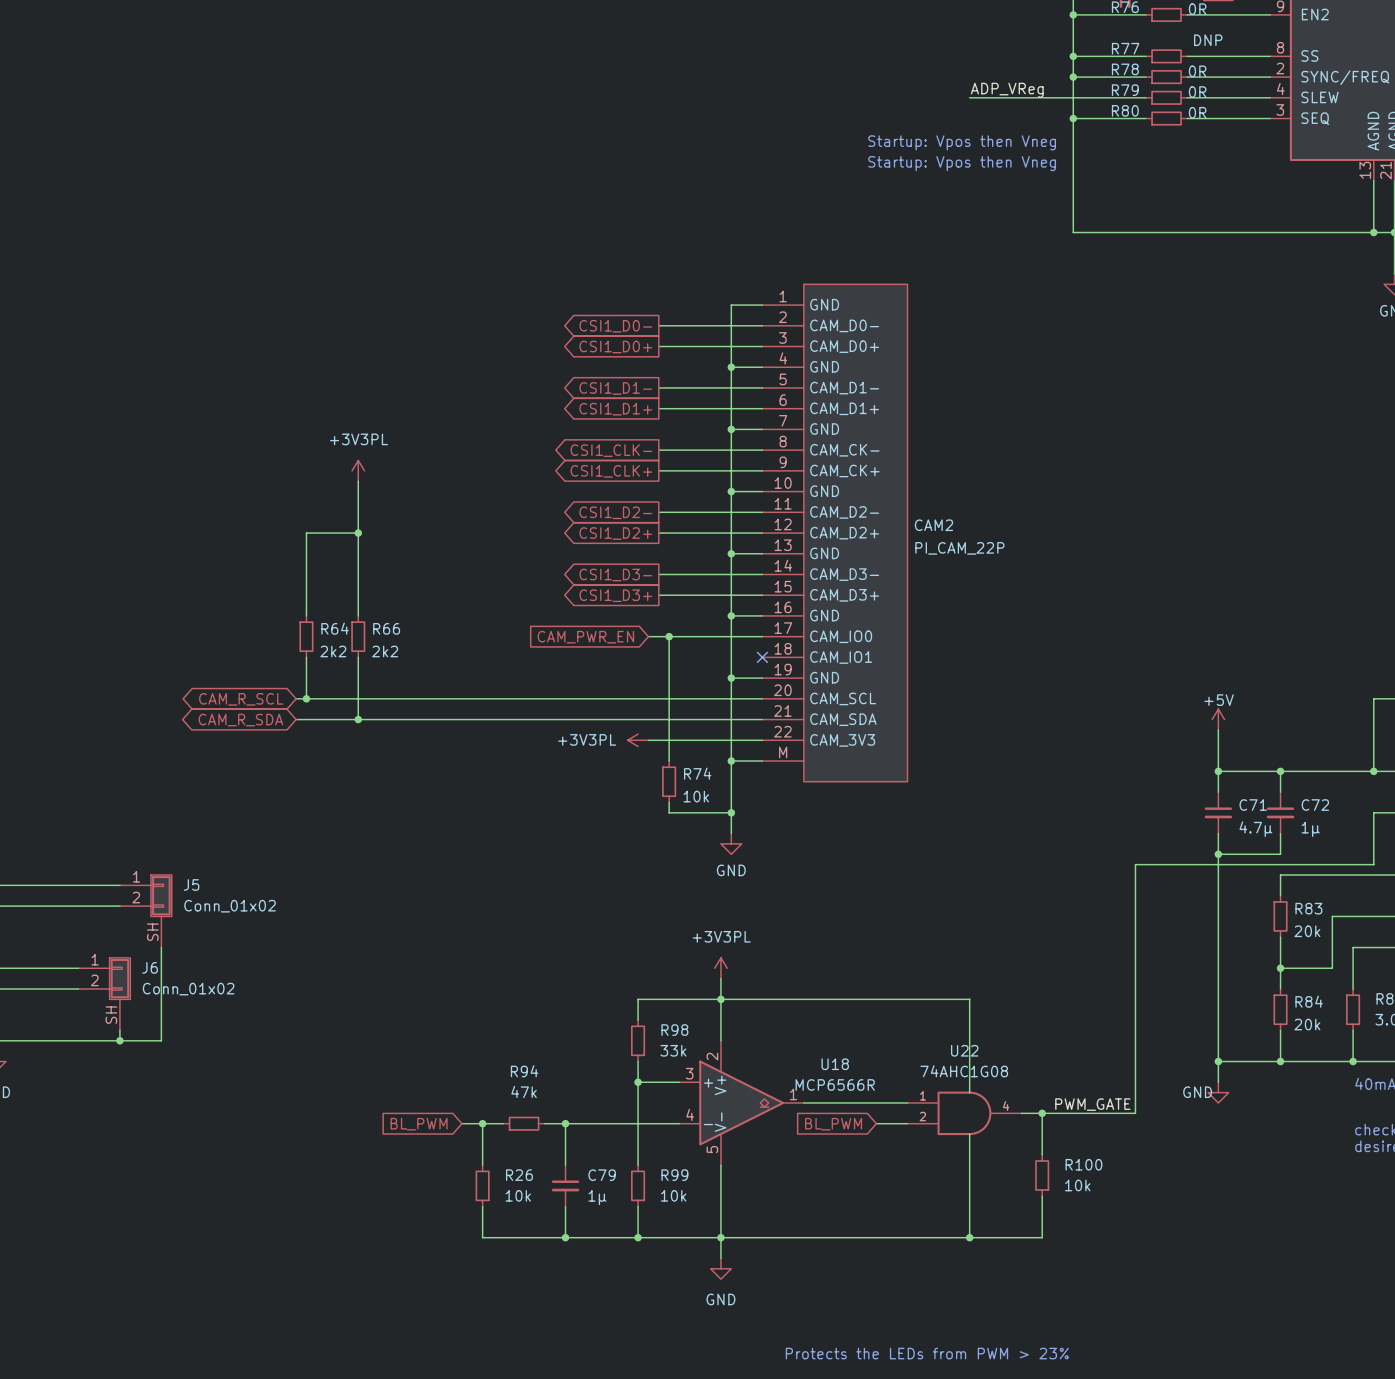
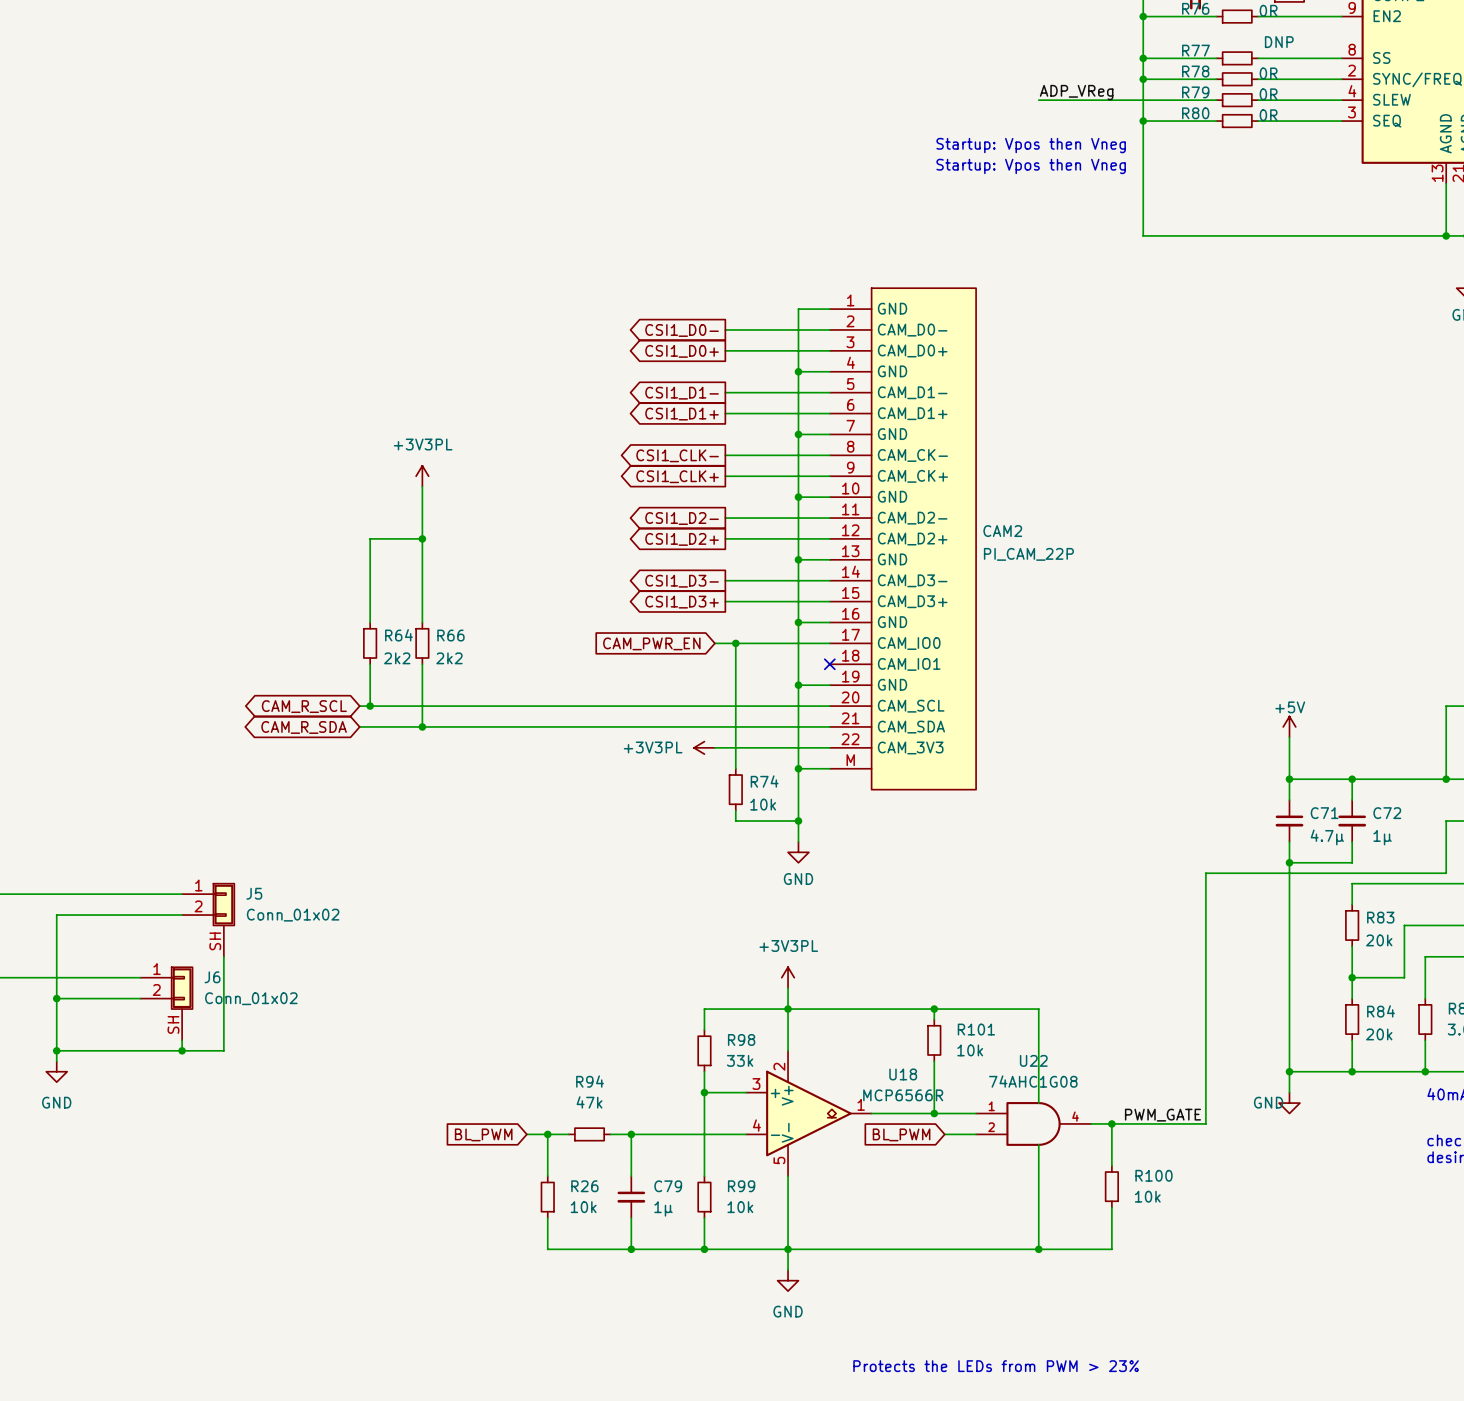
wire: none -> (934, 1009) (934, 1019)
junction: none -> (934, 1009)
R101: none -> 10k (934, 1040)
wire: none -> (934, 1061) (934, 1113)
junction: none -> (934, 1113)

